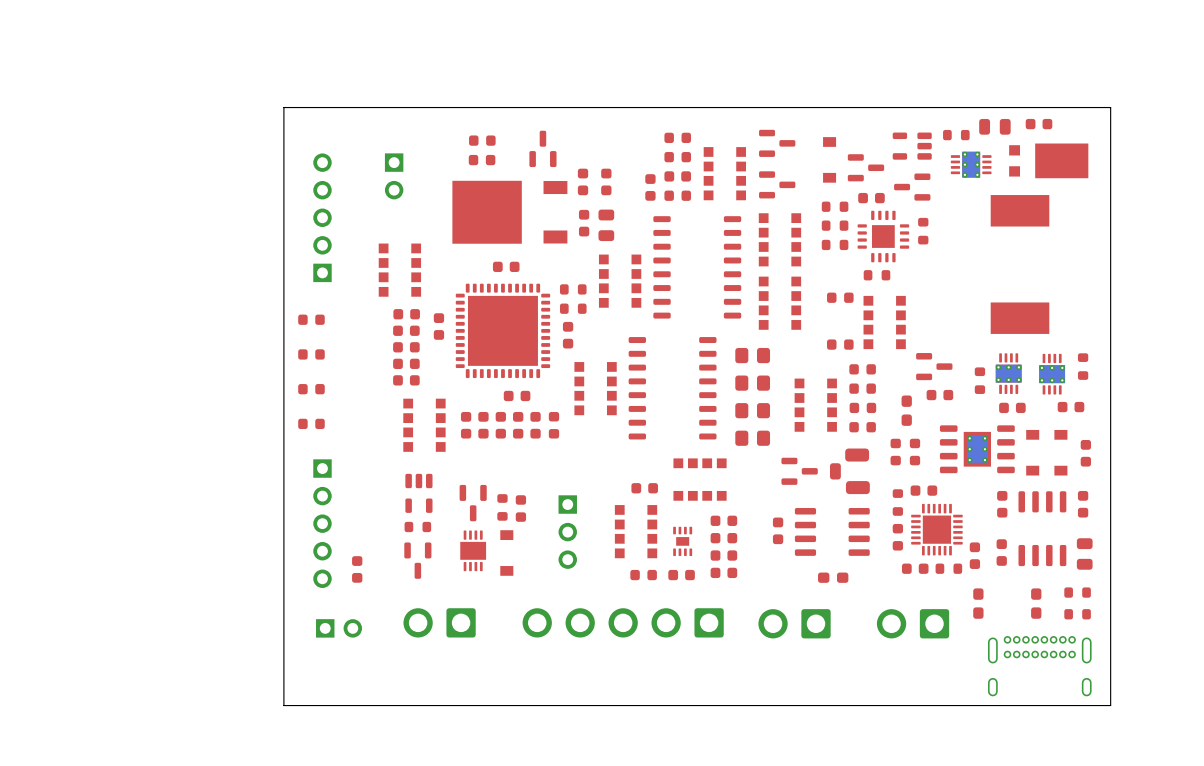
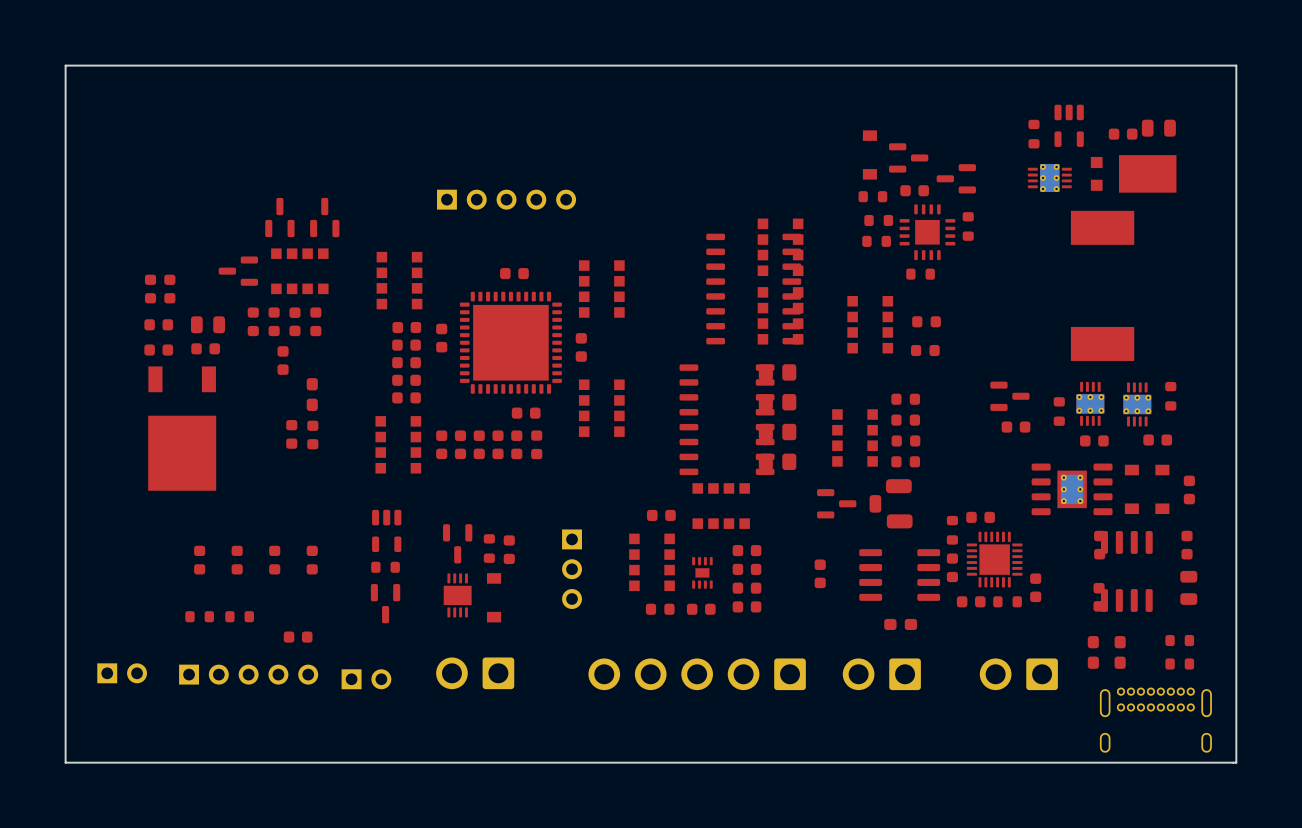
part position: (994, 126) -> (1158, 128)
part rotation: 0° (956, 135) -> 90° clockwise (1033, 134)
part: (677, 137) -> none
part: (482, 140) -> none
part: (777, 143) -> none
part: none -> (908, 157)
part rotation: 0° (912, 146) -> 90° counterclockwise (1069, 125)
part position: (912, 146) -> (1069, 125)
part: (542, 148) -> none
part: (677, 157) -> none
part position: (829, 159) -> (869, 154)
part: (482, 160) -> none
part: none -> (956, 178)
part: (865, 167) -> none
part: (724, 173) -> none
part: (394, 176) -> none
part: (677, 176) -> none
part: (583, 181) -> none
part: (606, 181) -> none
part: none -> (872, 196)
part: (777, 184) -> none
part: (650, 187) -> none
part: (912, 187) -> none
part: (677, 195) -> none
part position: (871, 198) -> (914, 190)
part: none -> (279, 217)
part: none -> (324, 217)
part: none -> (878, 220)
part: (835, 206) -> none
part: none -> (968, 226)
part: (509, 212) -> none
part rotation: 0° (322, 217) -> 90° clockwise (506, 199)
part position: (322, 217) -> (506, 199)
part: (584, 223) -> none
part: none -> (876, 241)
part: (606, 225) -> none
part: (835, 225) -> none
part: none -> (780, 247)
part: (923, 231) -> none
part position: (883, 236) -> (927, 232)
part: (779, 239) -> none
part: (835, 244) -> none
part: none -> (238, 271)
part: none -> (299, 271)
part: none -> (514, 273)
part: none -> (920, 274)
part: (506, 266) -> none
part: none -> (150, 289)
part: none -> (169, 289)
part: none -> (601, 289)
part position: (399, 270) -> (399, 280)
part: (876, 275) -> none
part: (620, 281) -> none
part: (573, 289) -> none
part: none -> (780, 315)
part: none -> (253, 321)
part: none -> (274, 321)
part: none -> (294, 321)
part: (840, 297) -> none
part: none -> (926, 321)
part: none -> (158, 324)
part: none -> (207, 324)
part: none -> (406, 327)
part position: (779, 303) -> (870, 324)
part: (573, 308) -> none
part rotation: 0° (406, 314) -> 90° clockwise (441, 338)
part rotation: 0° (311, 319) -> 90° clockwise (315, 321)
part position: (311, 319) -> (315, 321)
part: none -> (406, 345)
part: none -> (581, 347)
part: none -> (205, 348)
part: (884, 322) -> none
part: none -> (158, 350)
part: none -> (925, 350)
part: (438, 326) -> none
part: (406, 330) -> none
part position: (502, 330) -> (510, 342)
part: none -> (283, 360)
part: none -> (406, 362)
part: (568, 335) -> none
part: none -> (777, 372)
part: (840, 344) -> none
part: (406, 347) -> none
part: none -> (406, 380)
part: (311, 354) -> none
part: (752, 355) -> none
part: (406, 363) -> none
part: none -> (312, 394)
part: none -> (406, 397)
part: none -> (905, 399)
part: (862, 369) -> none
part: none -> (777, 402)
part: (406, 380) -> none
part: none -> (526, 413)
part: (752, 383) -> none
part position: (595, 388) -> (601, 408)
part: none -> (905, 420)
part: (862, 388) -> none
part: (311, 389) -> none
part: (517, 395) -> none
part: none -> (182, 428)
part: none -> (777, 432)
part: none -> (291, 434)
part: none -> (312, 434)
part position: (815, 405) -> (855, 437)
part: none -> (905, 440)
part: (862, 407) -> none
part: (752, 410) -> none
part: (906, 410) -> none
part: none -> (441, 444)
part: none -> (460, 444)
part: none -> (479, 444)
part: none -> (498, 444)
part: none -> (516, 444)
part: none -> (536, 444)
part: (311, 423) -> none
part position: (424, 425) -> (398, 444)
part: (466, 425) -> none
part: (483, 425) -> none
part: (500, 425) -> none
part: (518, 425) -> none
part: (535, 425) -> none
part: (553, 425) -> none
part: none -> (777, 461)
part: none -> (905, 461)
part: (862, 427) -> none
part: (752, 438) -> none
part position: (977, 449) -> (1072, 489)
part: (895, 452) -> none
part: (914, 452) -> none
part: (1032, 452) -> none
part: none -> (1131, 489)
part: (1060, 452) -> none
part: none -> (1162, 489)
part position: (1085, 453) -> (1189, 489)
part position: (799, 471) -> (836, 503)
part position: (849, 471) -> (891, 503)
part footprint: [405, 473, 433, 513] -> [443, 524, 473, 564]
part: none -> (661, 515)
part position: (700, 479) -> (721, 506)
part footprint: [459, 484, 487, 522] -> [503, 535, 515, 565]
part: (644, 488) -> none
part position: (923, 490) -> (980, 517)
part: none -> (386, 530)
part position: (897, 502) -> (952, 530)
part position: (1002, 504) -> (1099, 545)
part position: (1083, 504) -> (1187, 545)
part: none -> (489, 548)
part: (502, 507) -> none
part: (520, 508) -> none
part: none -> (747, 550)
part: none -> (199, 560)
part: none -> (237, 560)
part: none -> (274, 560)
part: none -> (312, 560)
part: (723, 520) -> none
part rotation: 0° (322, 523) -> 90° counterclockwise (248, 674)
part position: (322, 523) -> (248, 674)
part: none -> (385, 567)
part: (417, 526) -> none
part: none -> (747, 569)
part position: (936, 529) -> (994, 559)
part: none -> (820, 573)
part: (778, 530) -> none
part position: (636, 531) -> (652, 562)
part position: (567, 532) -> (572, 569)
part position: (897, 537) -> (952, 567)
part: (723, 538) -> none
part position: (682, 541) -> (702, 572)
part: none -> (747, 588)
part position: (473, 550) -> (457, 595)
part position: (1001, 552) -> (1099, 597)
part position: (506, 553) -> (494, 597)
part position: (1084, 553) -> (1188, 587)
part: (723, 555) -> none
part position: (974, 555) -> (1035, 587)
part position: (417, 560) -> (385, 603)
part: none -> (747, 606)
part: none -> (701, 609)
part position: (915, 568) -> (971, 601)
part position: (948, 568) -> (1007, 601)
part: (357, 569) -> none
part: none -> (199, 616)
part: none -> (239, 616)
part: (723, 572) -> none
part position: (643, 575) -> (660, 609)
part: (681, 575) -> none
part: none -> (298, 637)
part: (1077, 592) -> none
part: none -> (1179, 640)
part position: (978, 603) -> (1093, 652)
part: (1077, 614) -> none
part: none -> (1179, 663)
part: none -> (122, 673)
part position: (623, 622) -> (697, 674)
part position: (794, 623) -> (881, 674)
part position: (913, 623) -> (1018, 674)
part position: (1039, 666) -> (1155, 720)
board edge: (1110, 705) (1110, 107) (283, 107) (283, 705) -> (1200, 762) (1236, 762) (1236, 65) (65, 65) (65, 762) (306, 762)

